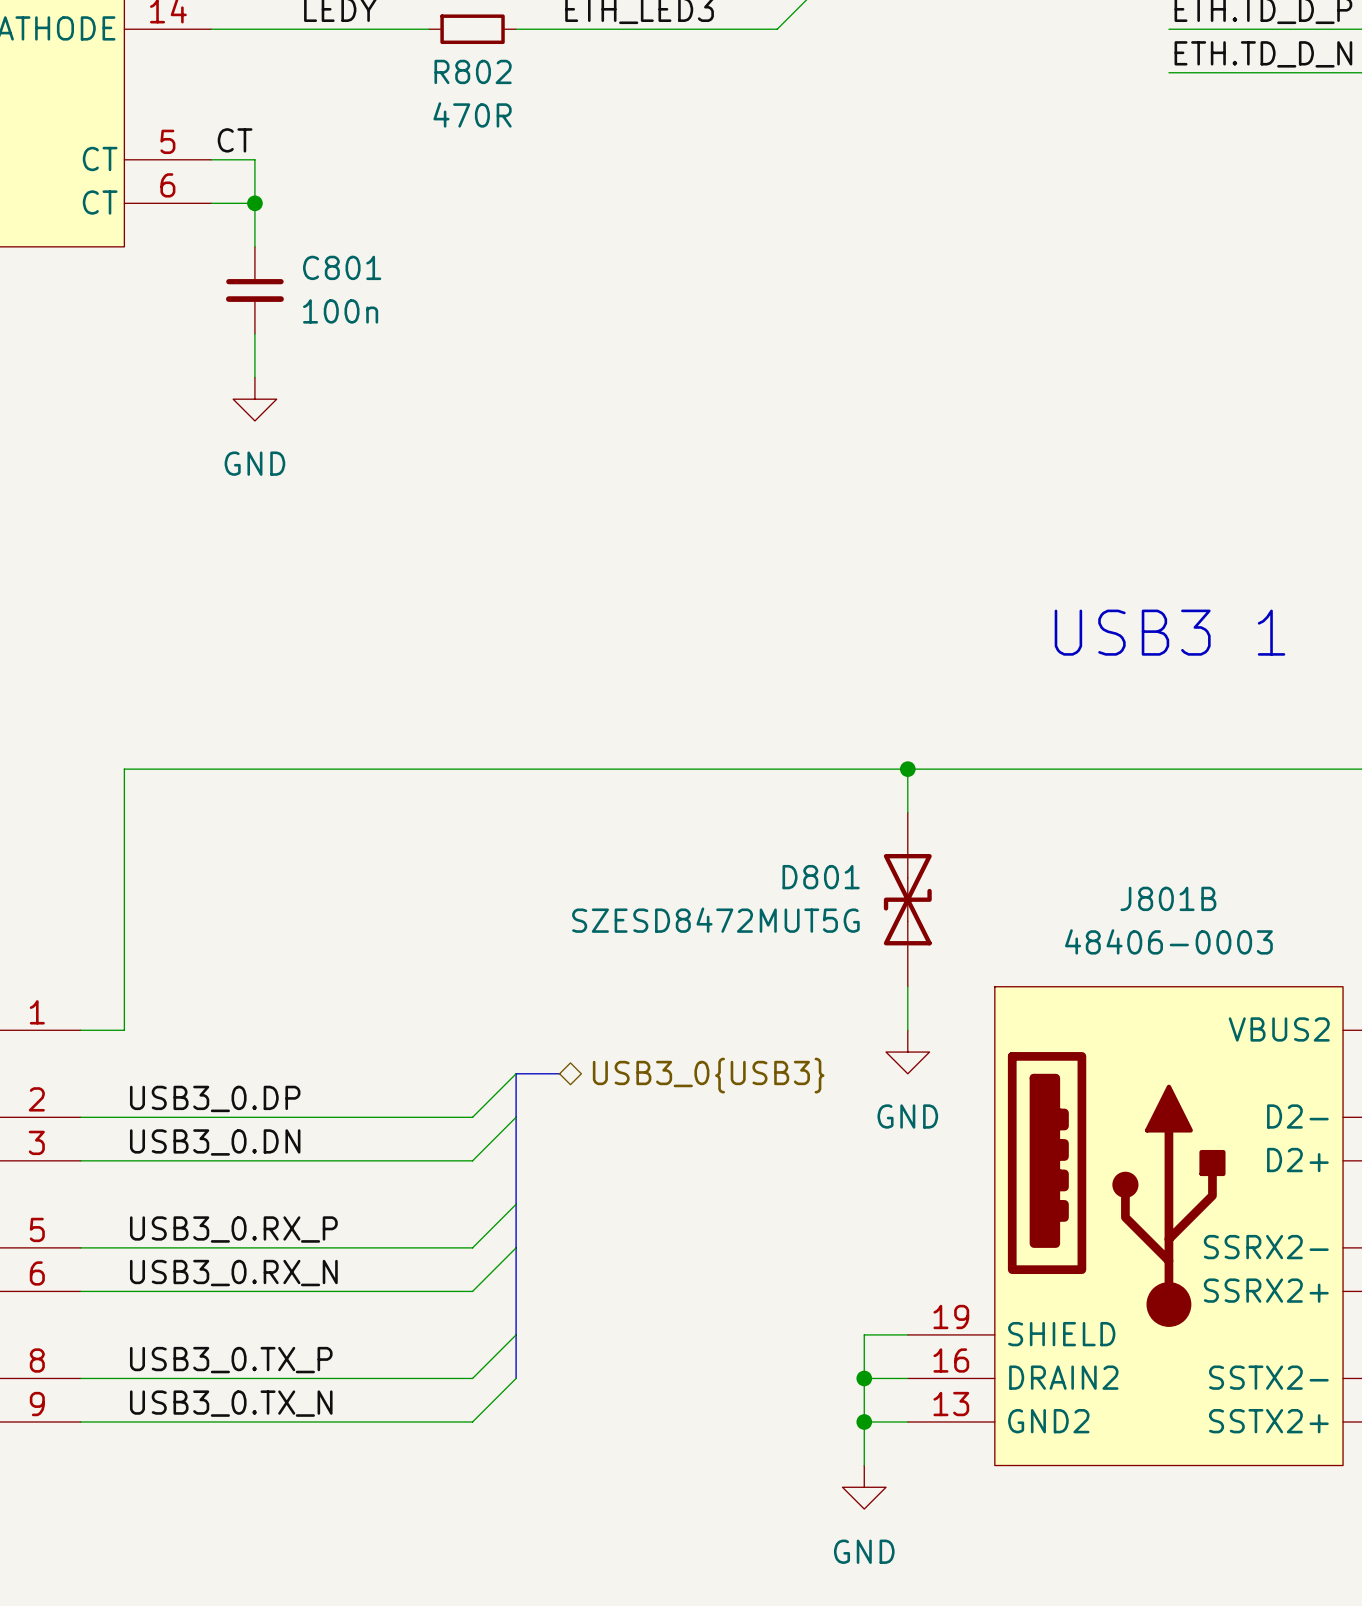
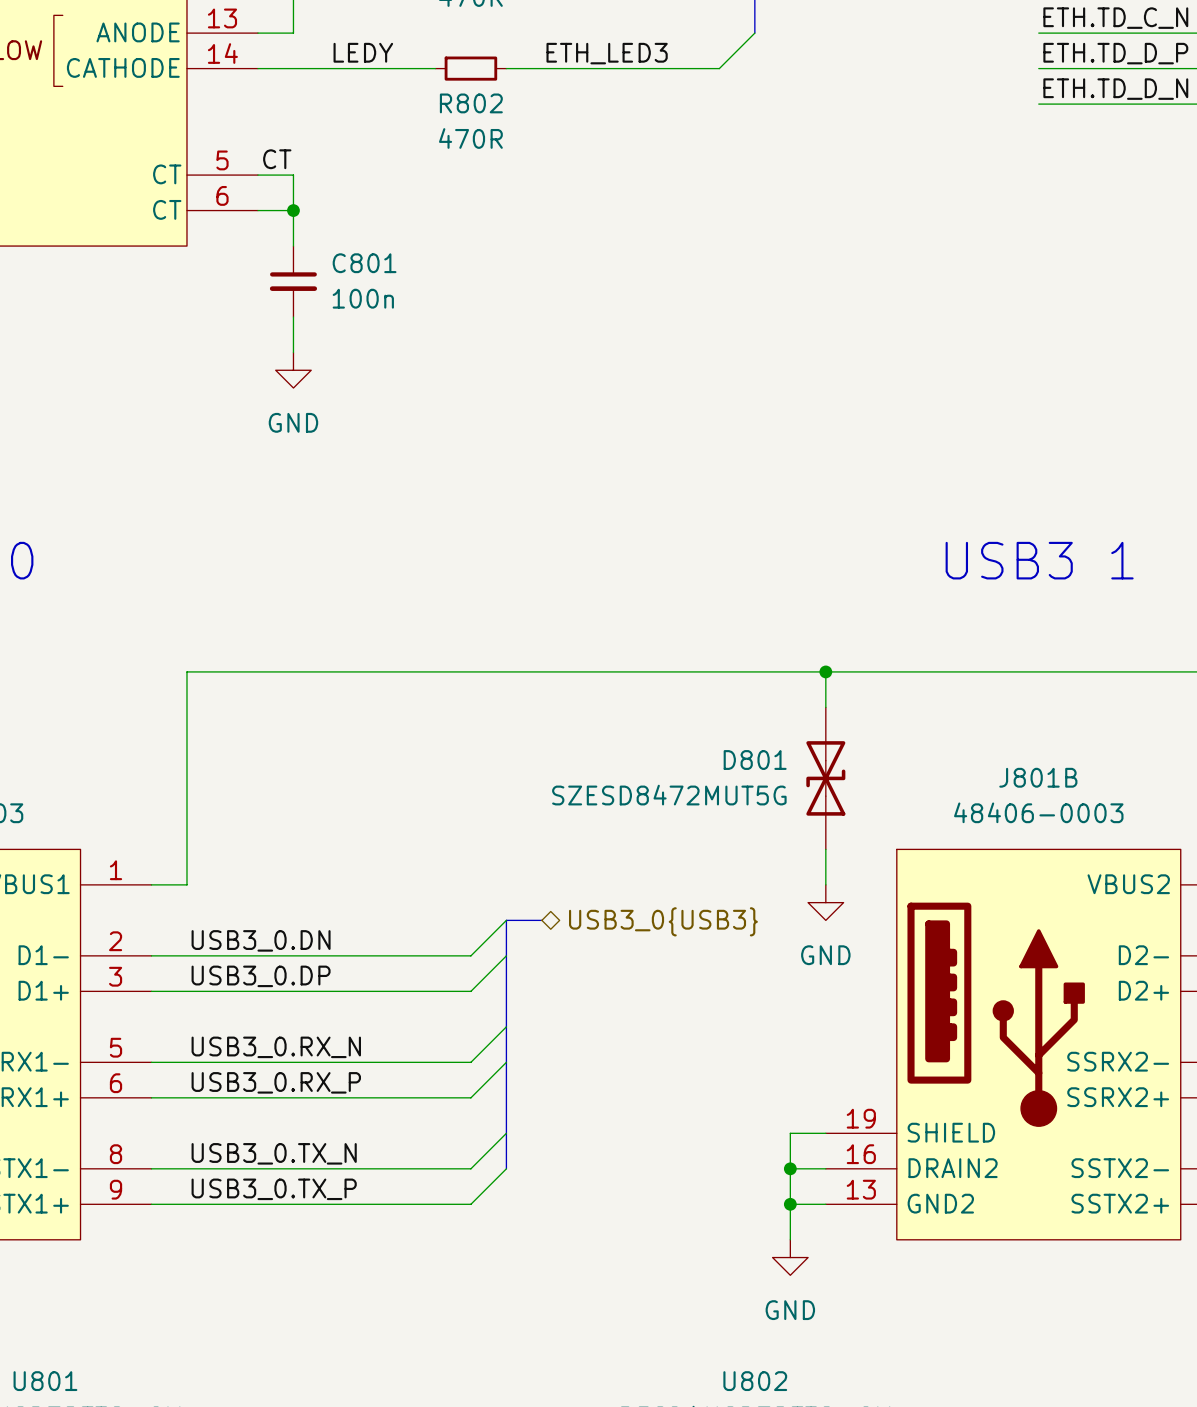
label: USB3_0.DP (215, 1098) -> USB3_0.DN (261, 940)
label: USB3_0.DN (215, 1142) -> USB3_0.DP (261, 976)
label: USB3_0.RX_P (233, 1229) -> USB3_0.RX_N (276, 1047)
label: USB3_0.RX_N (233, 1273) -> USB3_0.RX_P (276, 1082)
label: USB3_0.TX_P (231, 1360) -> USB3_0.TX_N (274, 1153)
label: USB3_0.TX_N (231, 1403) -> USB3_0.TX_P (274, 1189)

